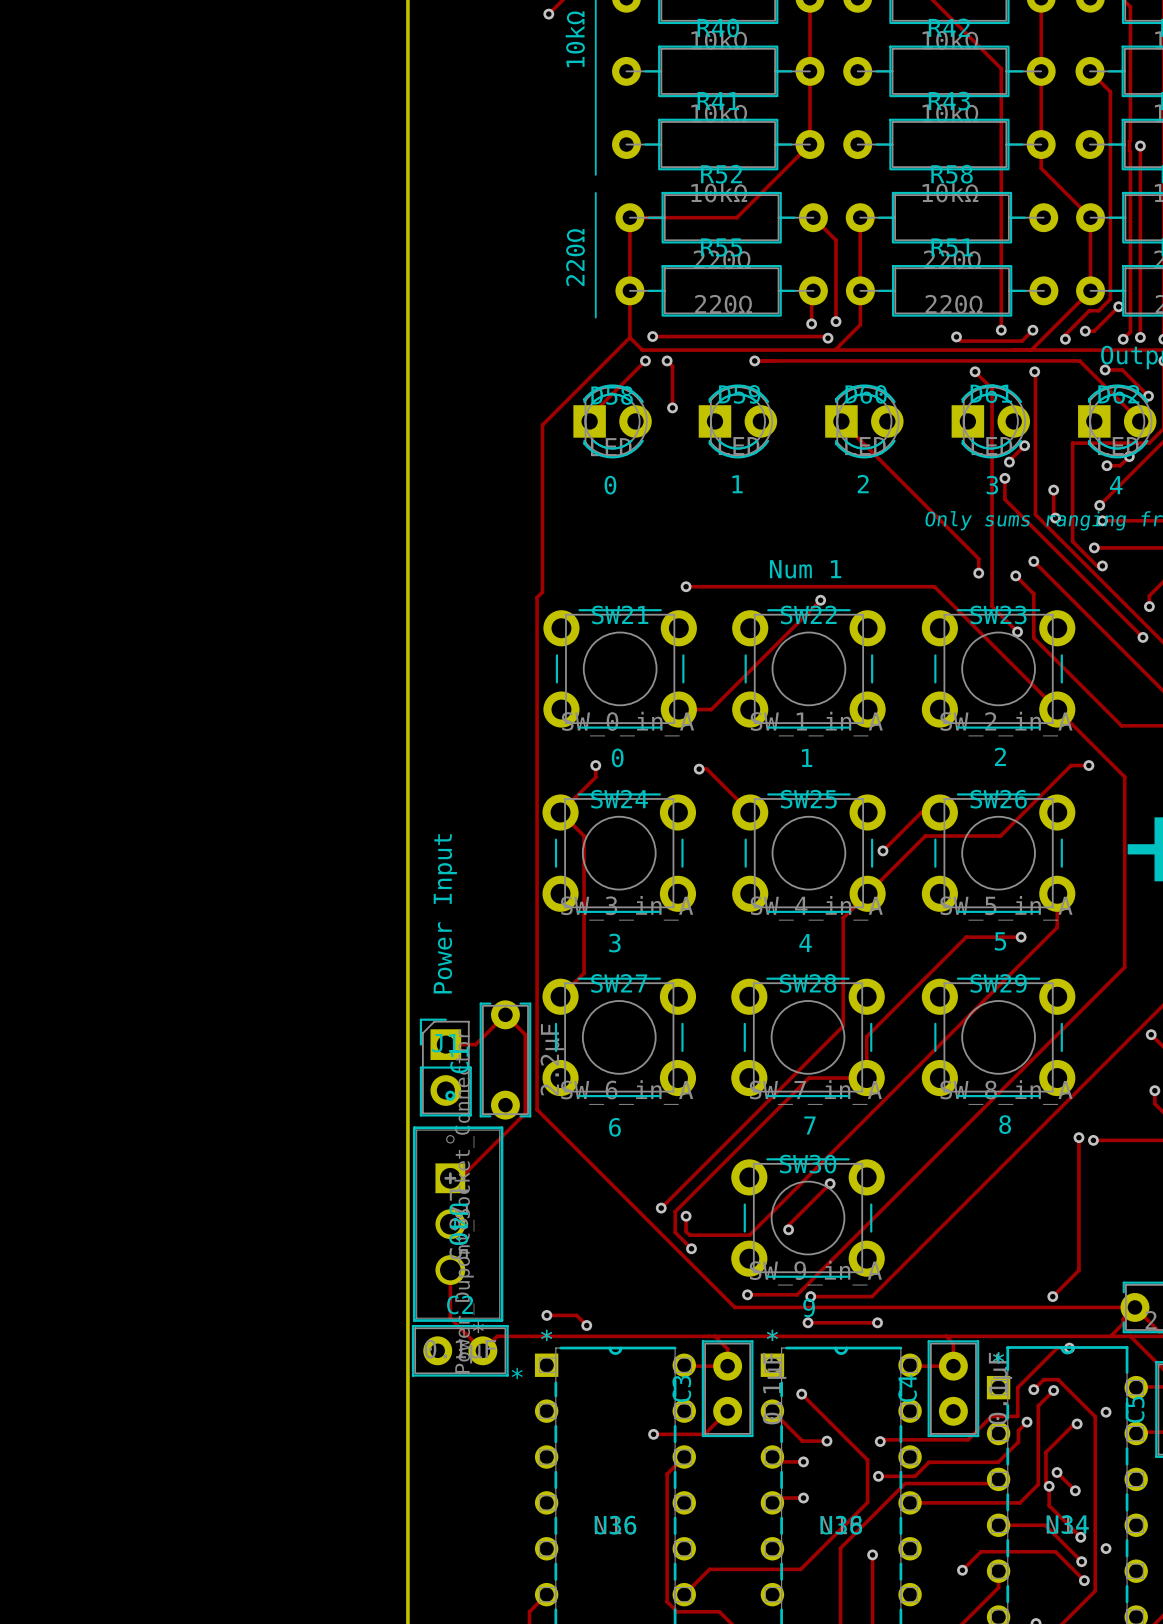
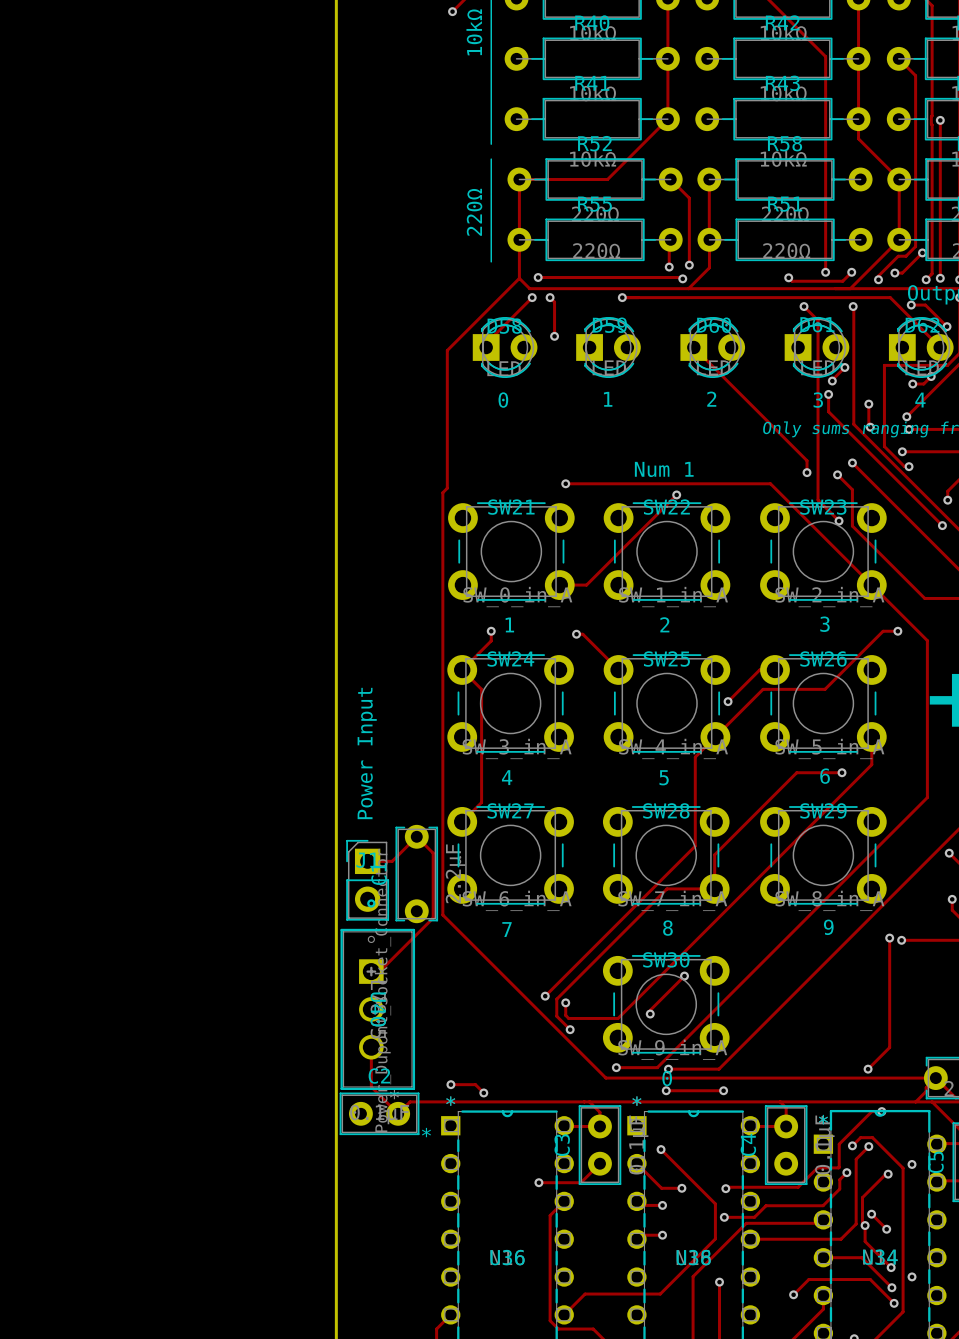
text: 2 (1000, 756) -> 3 (824, 624)
text: 0 (617, 757) -> 1 (509, 624)
text: 1 (807, 757) -> 2 (664, 624)
text: 5 (1000, 941) -> 6 (825, 776)
text: 3 (614, 943) -> 4 (507, 777)
text: 4 (805, 943) -> 5 (664, 777)
text: 8 (1005, 1124) -> 9 (828, 927)
text: 7 (809, 1125) -> 8 (667, 928)
text: 6 (614, 1127) -> 7 (507, 929)
text: 9 (809, 1307) -> 0 (667, 1078)

